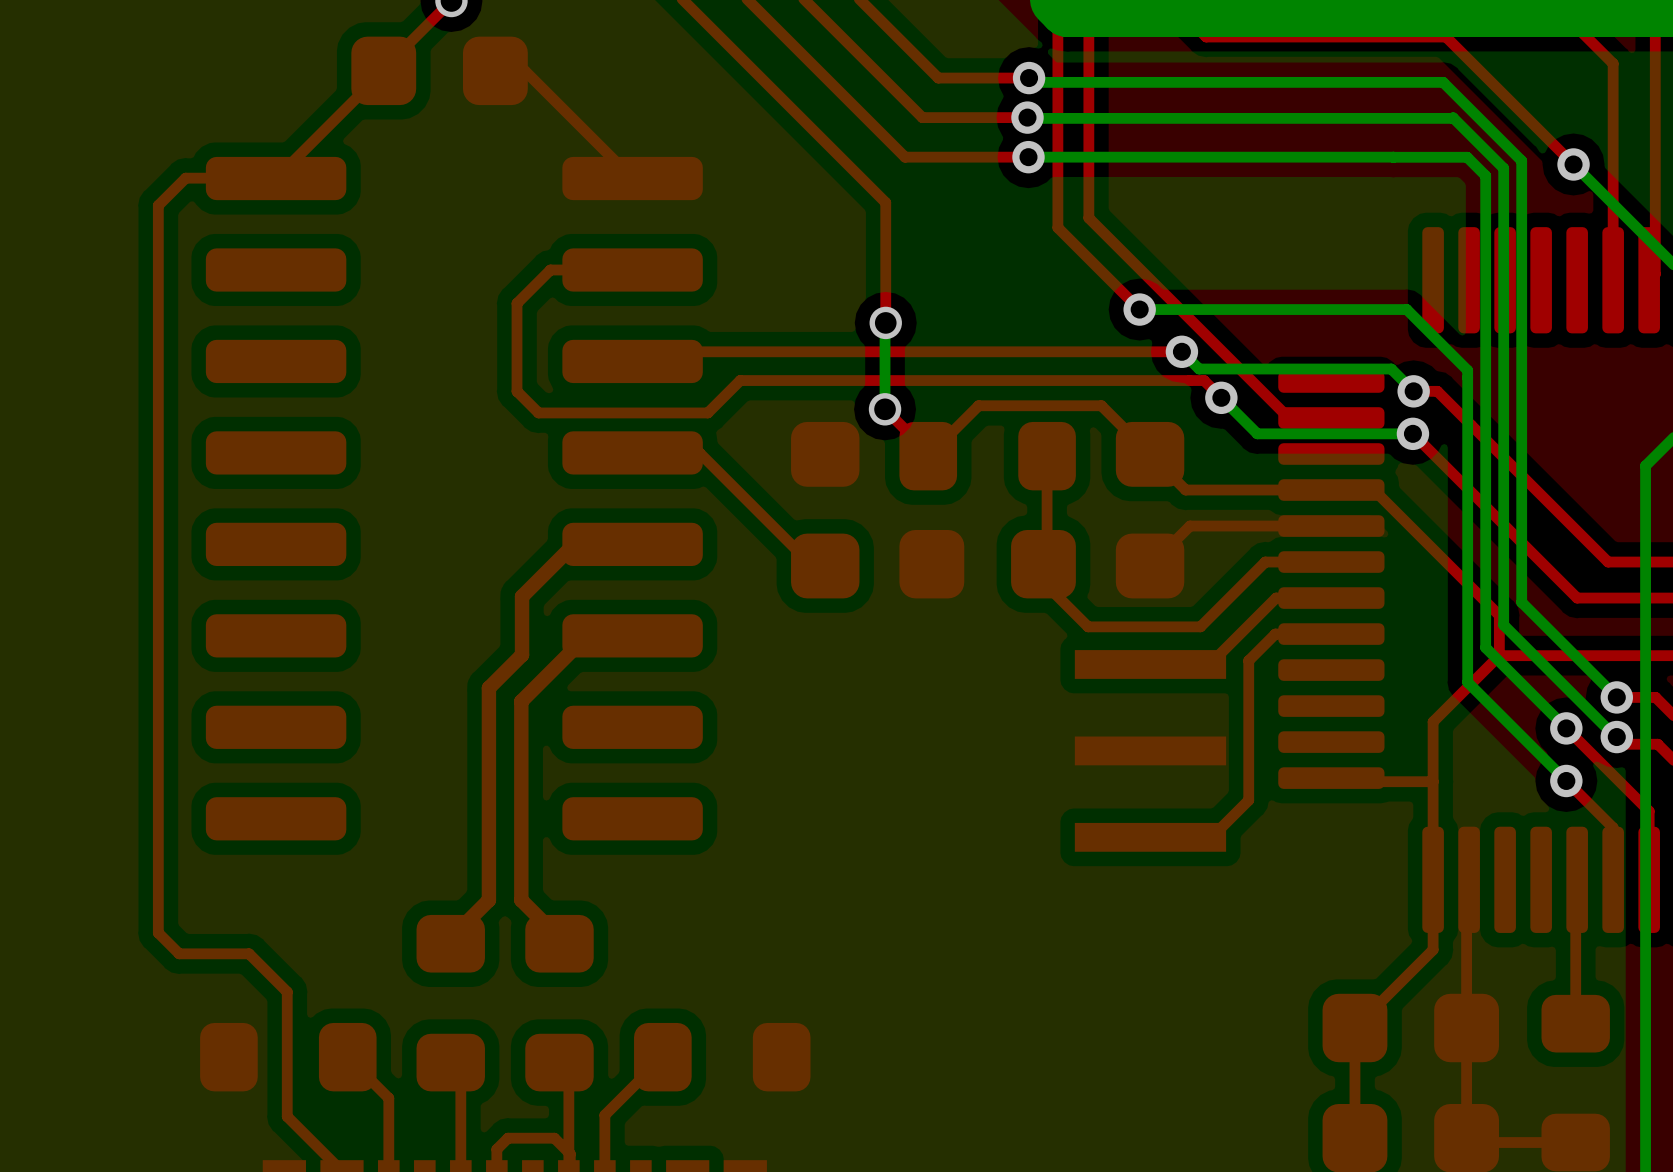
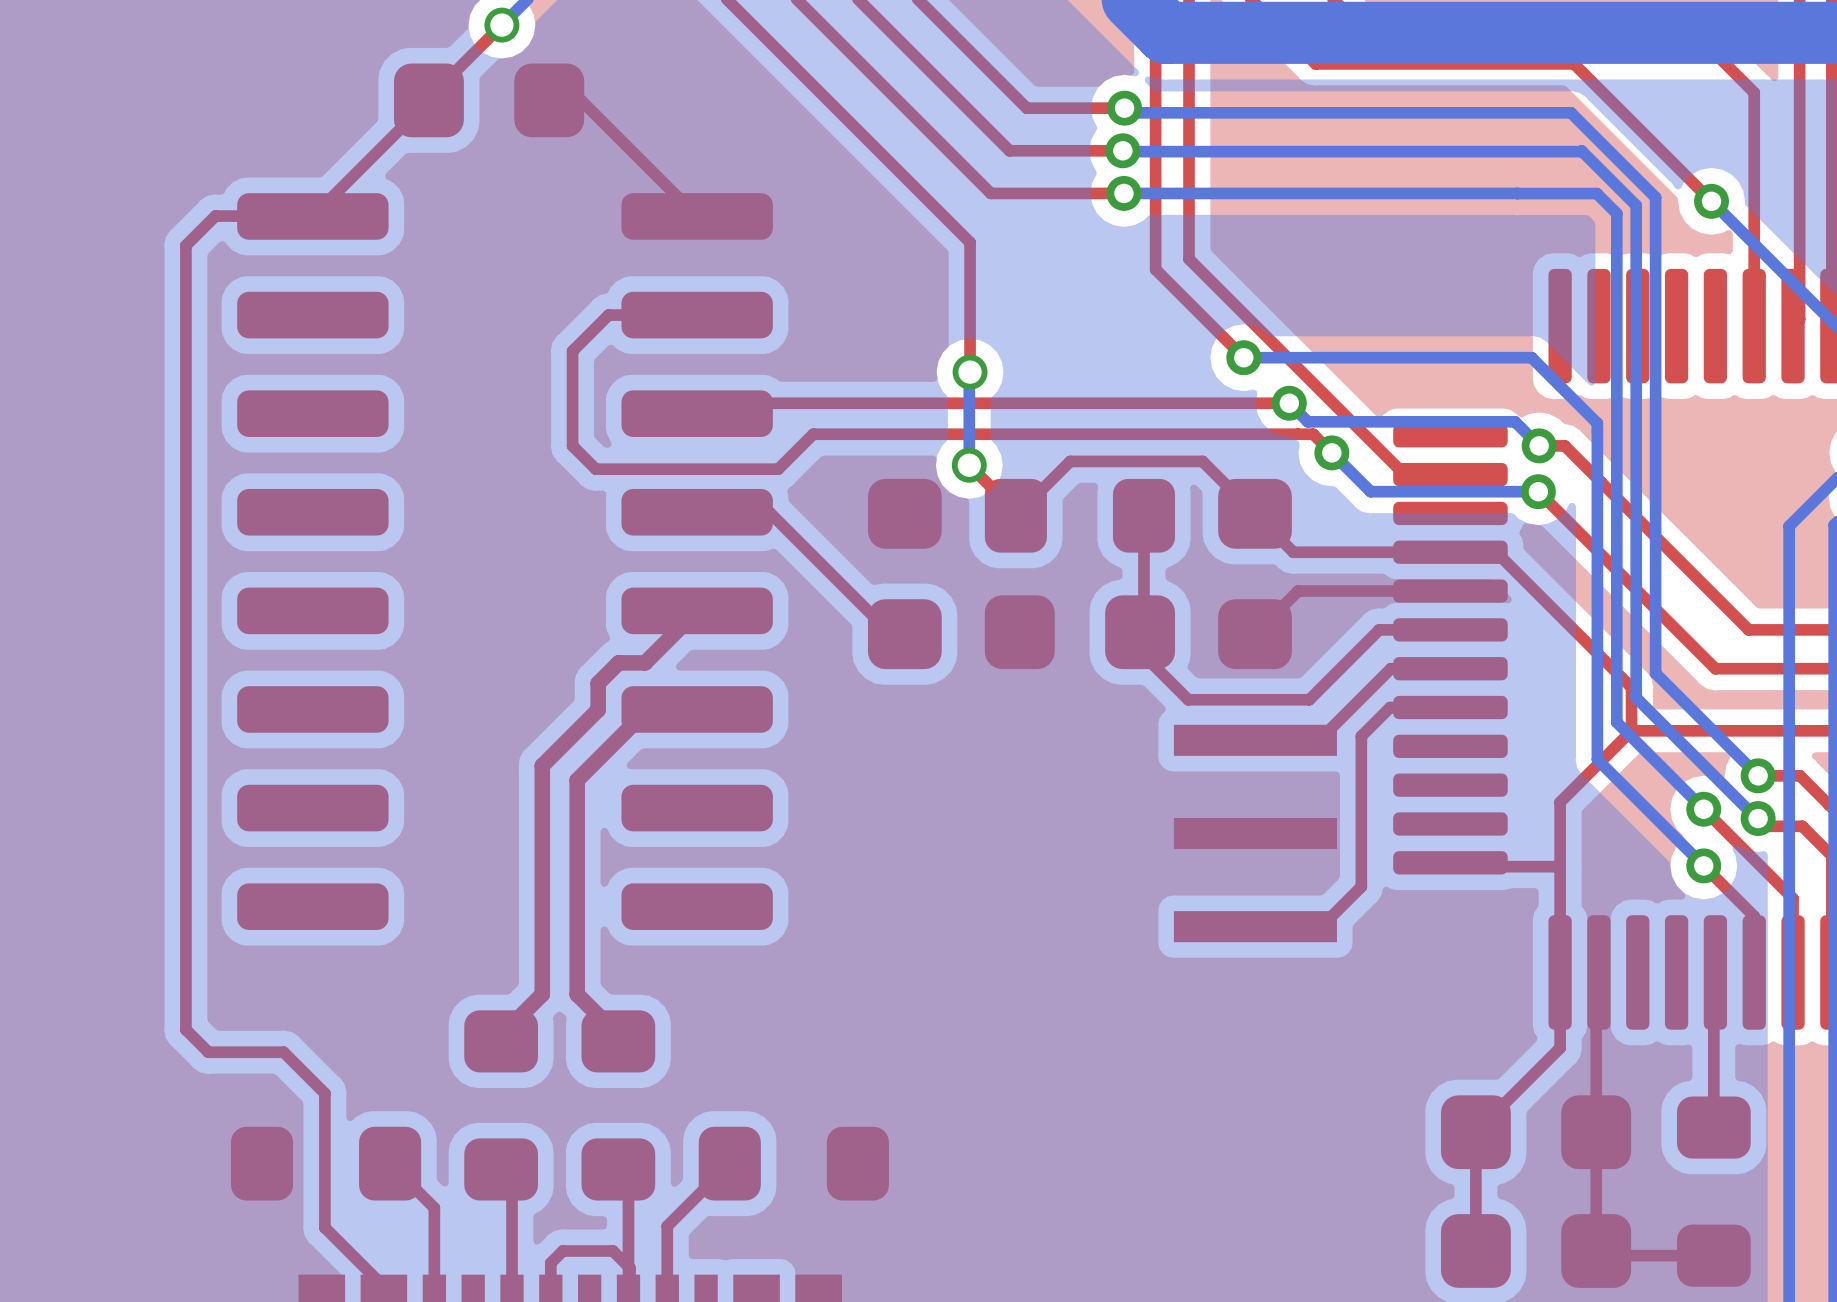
top track: (632, 544) (574, 544) (522, 596) (522, 654) -> (697, 610) (645, 662) (618, 662) (598, 683) (598, 709) (577, 730)

